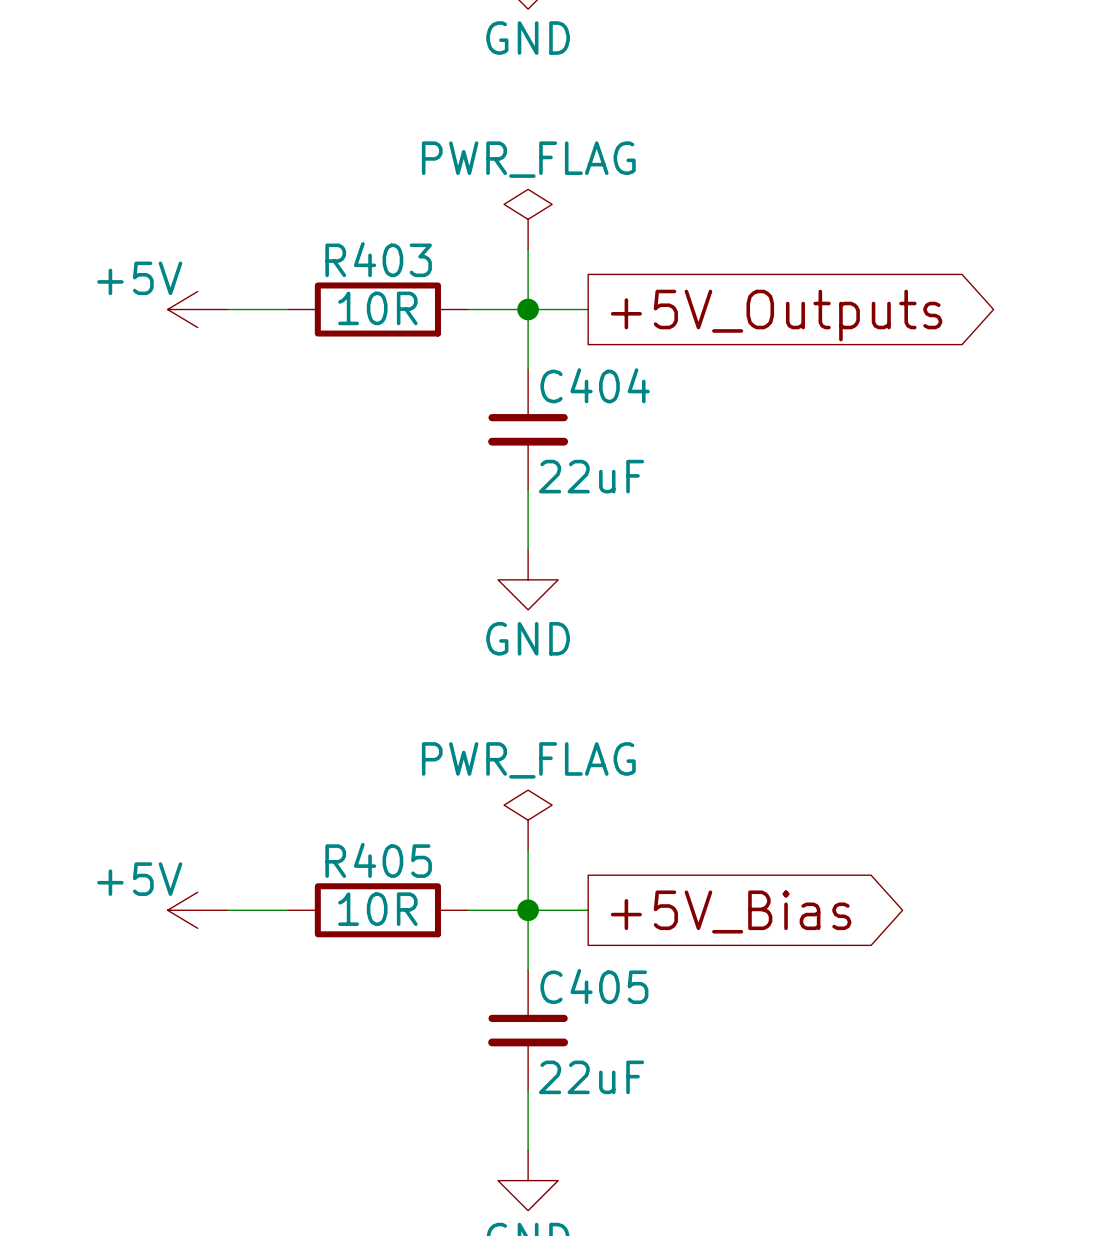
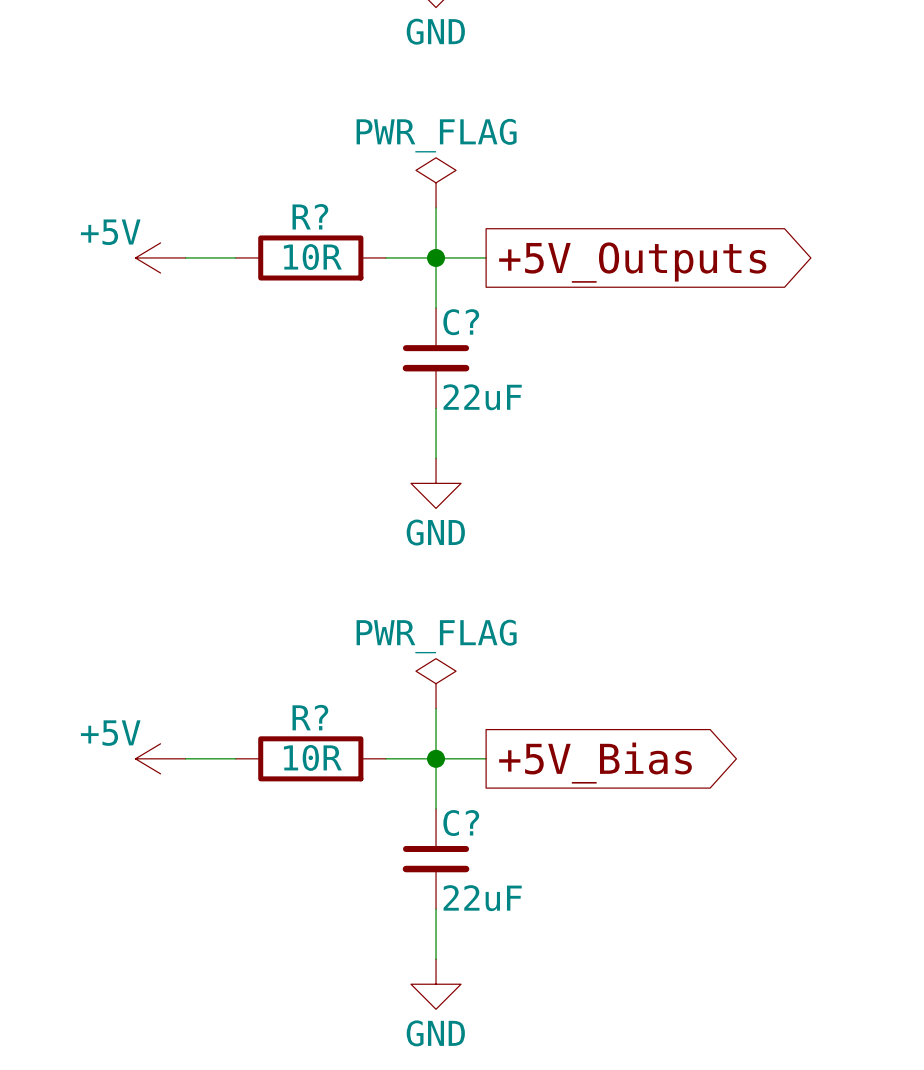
R403 name: R403 (378, 259) -> R? (310, 216)
C404 name: C404 (595, 385) -> C? (461, 322)
R405 name: R405 (378, 860) -> R? (310, 717)
C405 name: C405 (594, 986) -> C? (461, 823)

